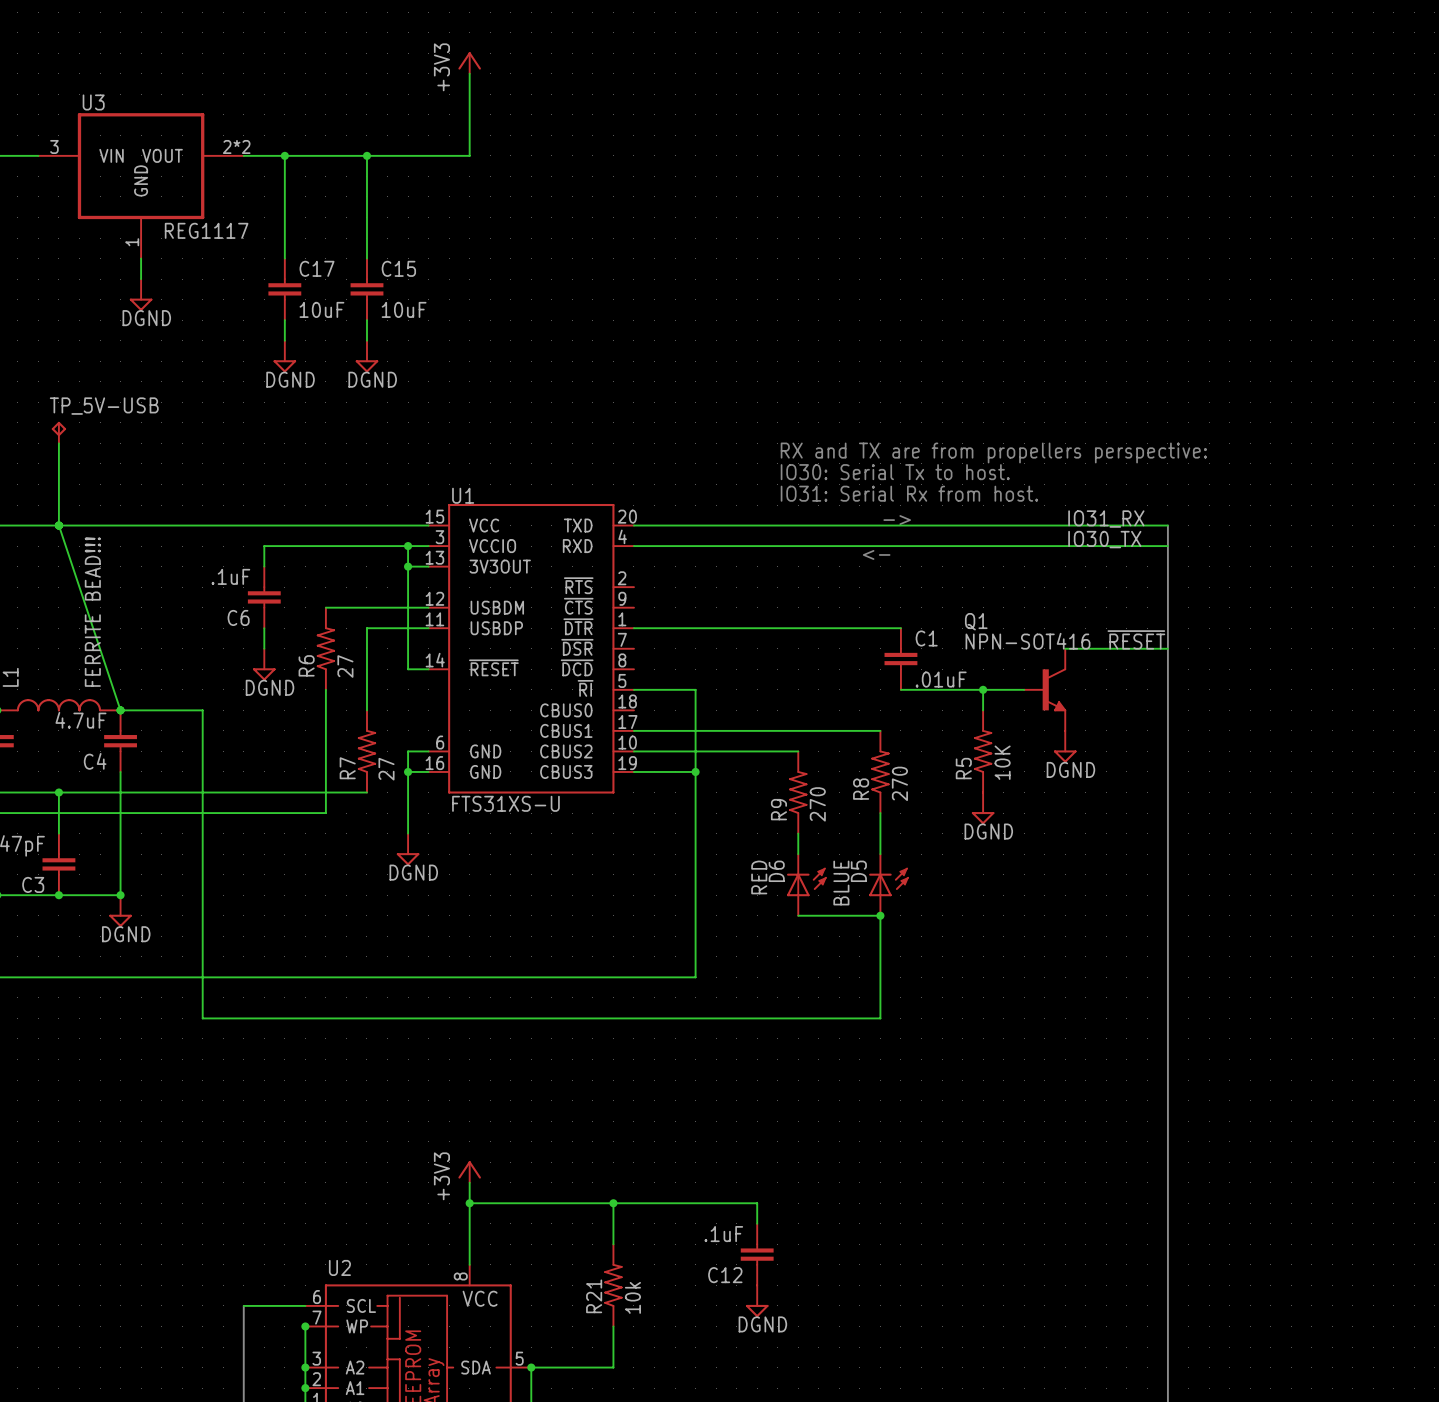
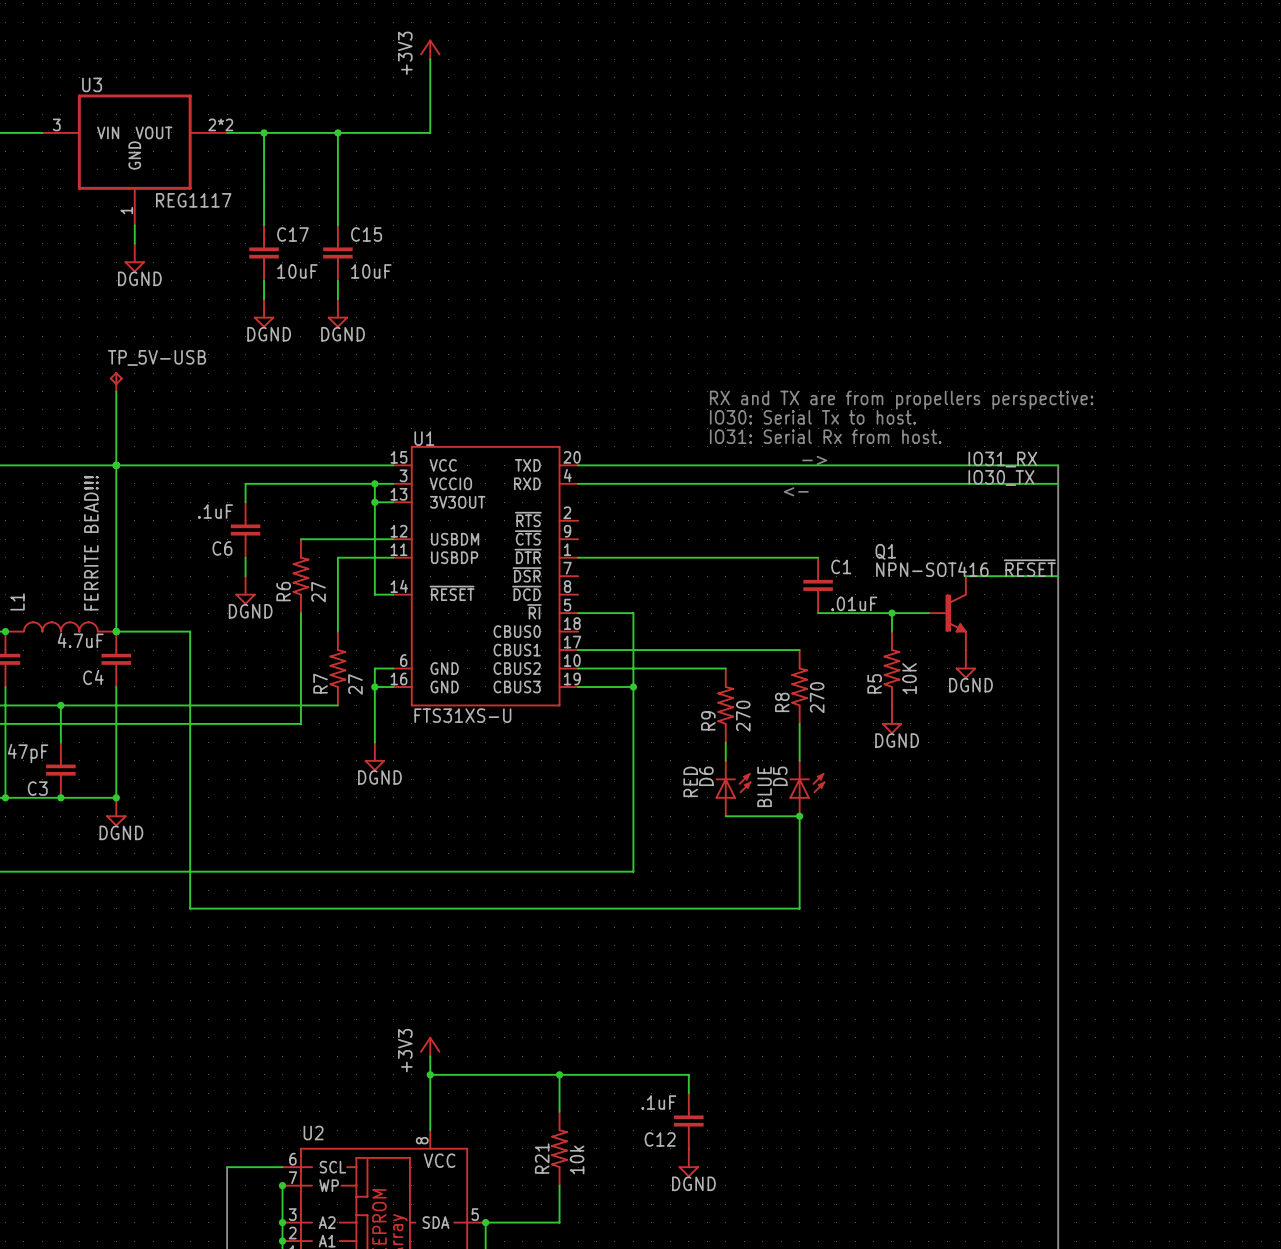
TP_5V-USB position: (58, 432) -> (116, 381)
wire: (58, 443) (58, 525) (120, 710) -> (116, 391) (116, 631)
junction: (58, 525) -> none
junction: none -> (116, 465)

